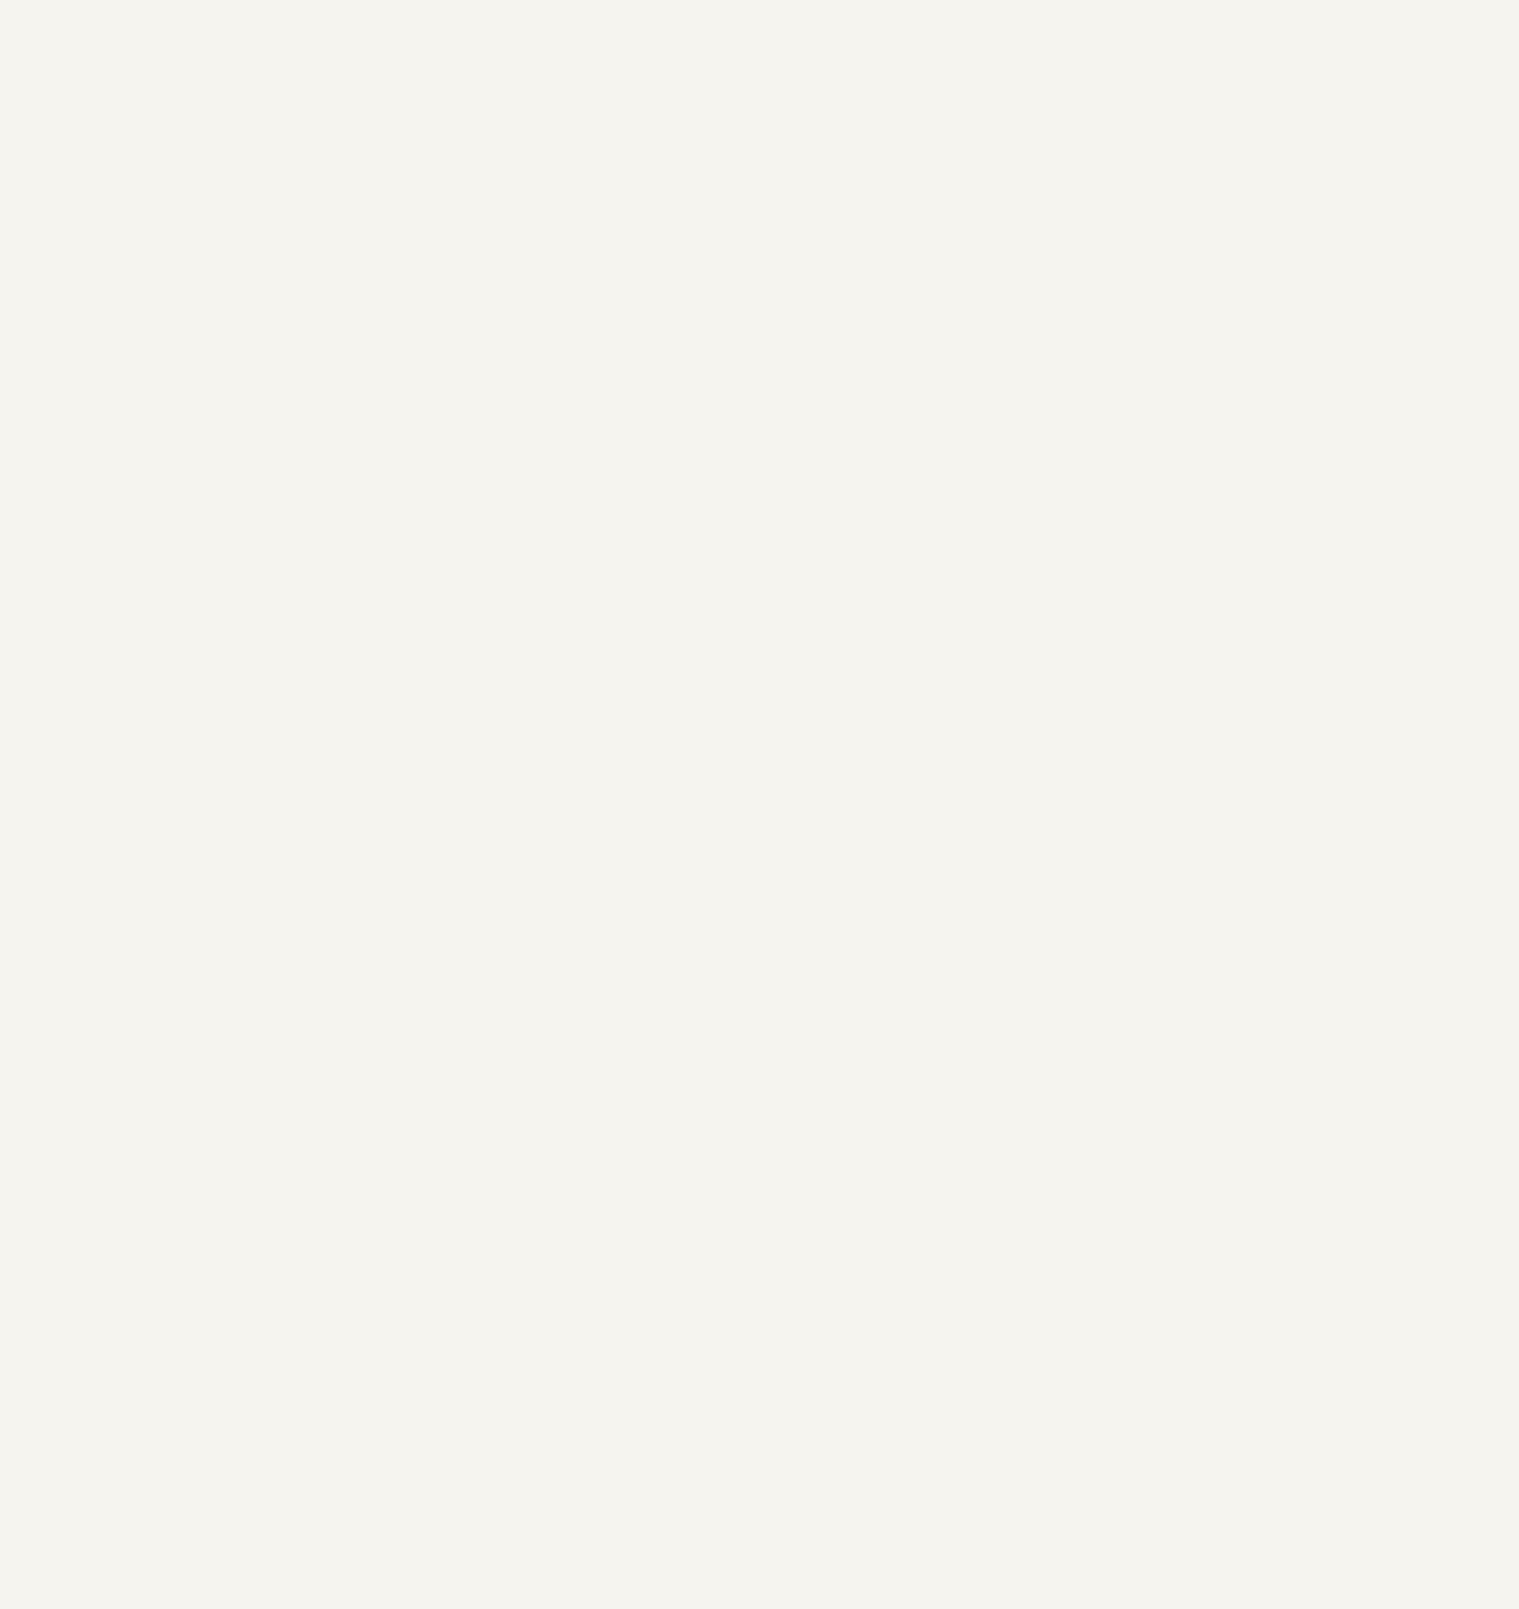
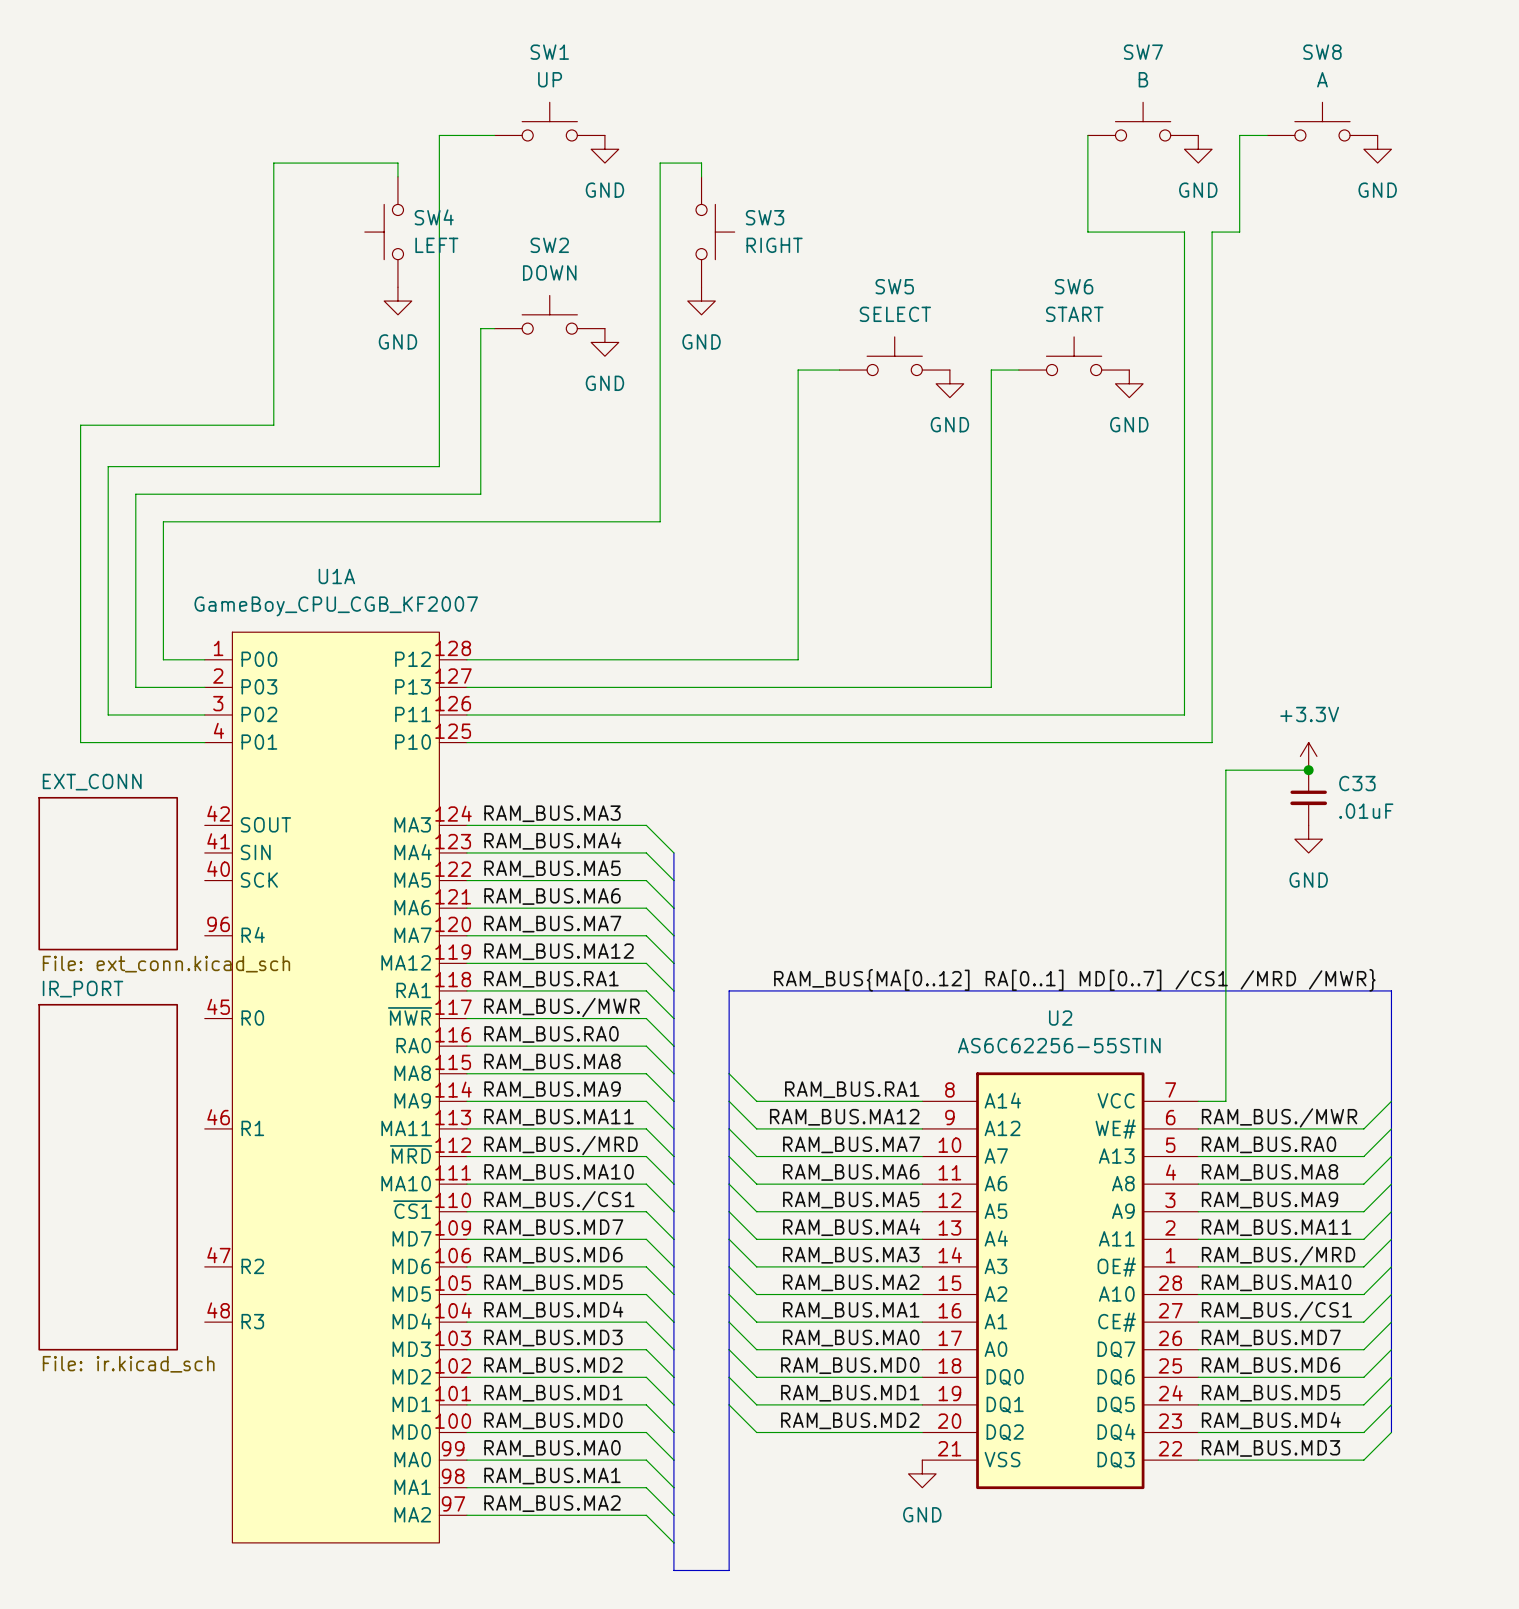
SW1: none -> UP (549, 121)
SW7: none -> B (1143, 121)
SW8: none -> A (1322, 121)
wire: none -> (494, 135) (439, 135) (439, 466) (108, 466) (108, 714) (204, 714)
wire: none -> (1087, 135) (1087, 232) (1184, 232) (1184, 714) (466, 714)
wire: none -> (1267, 135) (1239, 135) (1239, 232) (1212, 232) (1212, 742) (466, 742)
power symbol: none -> GND (604, 149)
power symbol: none -> GND (1198, 149)
power symbol: none -> GND (1377, 149)
wire: none -> (397, 176) (397, 163) (273, 163) (273, 425) (80, 425) (80, 742) (204, 742)
wire: none -> (701, 176) (701, 163) (660, 163) (660, 521) (163, 521) (163, 659) (204, 659)
SW4: none -> LEFT (384, 232)
SW3: none -> RIGHT (715, 232)
power symbol: none -> GND (397, 301)
power symbol: none -> GND (701, 301)
SW2: none -> DOWN (549, 314)
wire: none -> (494, 328) (480, 328) (480, 494) (135, 494) (135, 687) (204, 687)
power symbol: none -> GND (604, 342)
SW5: none -> SELECT (894, 356)
SW6: none -> START (1074, 356)
wire: none -> (839, 370) (798, 370) (798, 659) (466, 659)
wire: none -> (1018, 370) (991, 370) (991, 687) (466, 687)
power symbol: none -> GND (949, 383)
power symbol: none -> GND (1129, 383)
power symbol: none -> +3.3V (1308, 756)
wire: none -> (1308, 770) (1225, 770) (1225, 1101) (1198, 1101)
junction: none -> (1308, 770)
C33: none -> .01uF (1308, 797)
label: none -> RAM_BUS.MA3 (552, 813)
wire: none -> (466, 825) (646, 825) (673, 852)
power symbol: none -> GND (1308, 839)
label: none -> RAM_BUS.MA4 (552, 840)
wire: none -> (466, 852) (646, 852) (673, 880)
bus: none -> (673, 852) (673, 1570) (729, 1570) (729, 990) (1391, 990) (1391, 1432)
label: none -> RAM_BUS.MA5 (552, 868)
sheet EXT_CONN: none -> File: ext_conn.kicad_sch (108, 873)
wire: none -> (466, 880) (646, 880) (673, 908)
label: none -> RAM_BUS.MA6 (552, 896)
wire: none -> (466, 908) (646, 908) (673, 935)
label: none -> RAM_BUS.MA7 (552, 924)
wire: none -> (466, 935) (646, 935) (673, 963)
label: none -> RAM_BUS.MA12 (559, 951)
wire: none -> (466, 963) (646, 963) (673, 990)
label: none -> RAM_BUS.RA1 (551, 979)
label: none -> RAM_BUS{MA[0..12] RA[0..1] MD[0..7] /CS1 /MRD /MWR} (1074, 980)
wire: none -> (466, 990) (646, 990) (673, 1018)
label: none -> RAM_BUS./MWR (562, 1007)
wire: none -> (466, 1018) (646, 1018) (673, 1046)
label: none -> RAM_BUS.RA0 (551, 1034)
wire: none -> (466, 1046) (646, 1046) (673, 1073)
label: none -> RAM_BUS.MA8 (552, 1062)
wire: none -> (466, 1073) (646, 1073) (673, 1101)
wire: none -> (729, 1073) (756, 1101) (922, 1101)
U1A: none -> GameBoy_CPU_CGB_KF2007 (335, 1087)
label: none -> RAM_BUS.MA9 (552, 1089)
label: none -> RAM_BUS.RA1 (852, 1089)
wire: none -> (466, 1101) (646, 1101) (673, 1128)
wire: none -> (729, 1101) (756, 1128) (922, 1128)
wire: none -> (1391, 1101) (1363, 1128) (1198, 1128)
label: none -> RAM_BUS.MA11 (559, 1117)
label: none -> RAM_BUS.MA12 (844, 1117)
label: none -> RAM_BUS./MWR (1279, 1117)
wire: none -> (466, 1128) (646, 1128) (673, 1156)
wire: none -> (729, 1128) (756, 1156) (922, 1156)
wire: none -> (1391, 1128) (1363, 1156) (1198, 1156)
label: none -> RAM_BUS.MA7 (851, 1144)
label: none -> RAM_BUS.RA0 (1269, 1144)
label: none -> RAM_BUS./MRD (561, 1145)
wire: none -> (466, 1156) (646, 1156) (673, 1184)
wire: none -> (729, 1156) (756, 1184) (922, 1184)
wire: none -> (1391, 1156) (1363, 1184) (1198, 1184)
label: none -> RAM_BUS.MA10 (559, 1172)
label: none -> RAM_BUS.MA6 (851, 1172)
label: none -> RAM_BUS.MA8 (1270, 1172)
sheet IR_PORT: none -> File: ir.kicad_sch (108, 1177)
wire: none -> (466, 1184) (646, 1184) (673, 1211)
wire: none -> (729, 1184) (756, 1211) (922, 1211)
wire: none -> (1391, 1184) (1363, 1211) (1198, 1211)
label: none -> RAM_BUS./CS1 (559, 1200)
label: none -> RAM_BUS.MA5 (851, 1200)
label: none -> RAM_BUS.MA9 (1270, 1200)
wire: none -> (466, 1211) (646, 1211) (673, 1239)
wire: none -> (729, 1211) (756, 1239) (922, 1239)
wire: none -> (1391, 1211) (1363, 1239) (1198, 1239)
label: none -> RAM_BUS.MD7 (553, 1227)
label: none -> RAM_BUS.MA4 (851, 1227)
label: none -> RAM_BUS.MA11 (1276, 1227)
wire: none -> (466, 1239) (646, 1239) (673, 1266)
wire: none -> (729, 1239) (756, 1266) (922, 1266)
wire: none -> (1391, 1239) (1363, 1266) (1198, 1266)
label: none -> RAM_BUS.MD6 (553, 1255)
label: none -> RAM_BUS.MA3 (851, 1255)
label: none -> RAM_BUS./MRD (1278, 1255)
wire: none -> (466, 1266) (646, 1266) (673, 1294)
wire: none -> (729, 1266) (756, 1294) (922, 1294)
wire: none -> (1391, 1266) (1363, 1294) (1198, 1294)
U2: none -> AS6C62256-55STIN (1060, 1280)
label: none -> RAM_BUS.MD5 (553, 1282)
label: none -> RAM_BUS.MA2 (851, 1282)
label: none -> RAM_BUS.MA10 (1276, 1282)
wire: none -> (466, 1294) (646, 1294) (673, 1322)
wire: none -> (729, 1294) (756, 1322) (922, 1322)
wire: none -> (1391, 1294) (1363, 1322) (1198, 1322)
label: none -> RAM_BUS.MD4 (553, 1310)
label: none -> RAM_BUS.MA1 (851, 1310)
label: none -> RAM_BUS./CS1 (1276, 1311)
wire: none -> (466, 1322) (646, 1322) (673, 1349)
wire: none -> (729, 1322) (756, 1349) (922, 1349)
wire: none -> (1391, 1322) (1363, 1349) (1198, 1349)
label: none -> RAM_BUS.MD3 (553, 1338)
label: none -> RAM_BUS.MA0 (851, 1338)
label: none -> RAM_BUS.MD7 (1271, 1338)
wire: none -> (466, 1349) (646, 1349) (673, 1377)
wire: none -> (729, 1349) (756, 1377) (922, 1377)
wire: none -> (1391, 1349) (1363, 1377) (1198, 1377)
label: none -> RAM_BUS.MD2 (553, 1365)
label: none -> RAM_BUS.MD0 (850, 1365)
label: none -> RAM_BUS.MD6 (1270, 1365)
wire: none -> (466, 1377) (646, 1377) (673, 1404)
wire: none -> (729, 1377) (756, 1404) (922, 1404)
wire: none -> (1391, 1377) (1363, 1404) (1198, 1404)
label: none -> RAM_BUS.MD1 (553, 1393)
label: none -> RAM_BUS.MD1 (850, 1393)
label: none -> RAM_BUS.MD5 (1270, 1393)
wire: none -> (466, 1404) (646, 1404) (673, 1432)
wire: none -> (729, 1404) (756, 1432) (922, 1432)
wire: none -> (1391, 1404) (1363, 1432) (1198, 1432)
label: none -> RAM_BUS.MD0 (553, 1420)
label: none -> RAM_BUS.MD2 (850, 1420)
label: none -> RAM_BUS.MD4 (1271, 1420)
wire: none -> (466, 1432) (646, 1432) (673, 1460)
wire: none -> (1391, 1432) (1363, 1460) (1198, 1460)
label: none -> RAM_BUS.MA0 (552, 1448)
label: none -> RAM_BUS.MD3 (1270, 1448)
wire: none -> (466, 1460) (646, 1460) (673, 1487)
power symbol: none -> GND (922, 1473)
label: none -> RAM_BUS.MA1 (552, 1476)
wire: none -> (466, 1487) (646, 1487) (673, 1515)
label: none -> RAM_BUS.MA2 (552, 1503)
wire: none -> (466, 1515) (646, 1515) (673, 1542)

